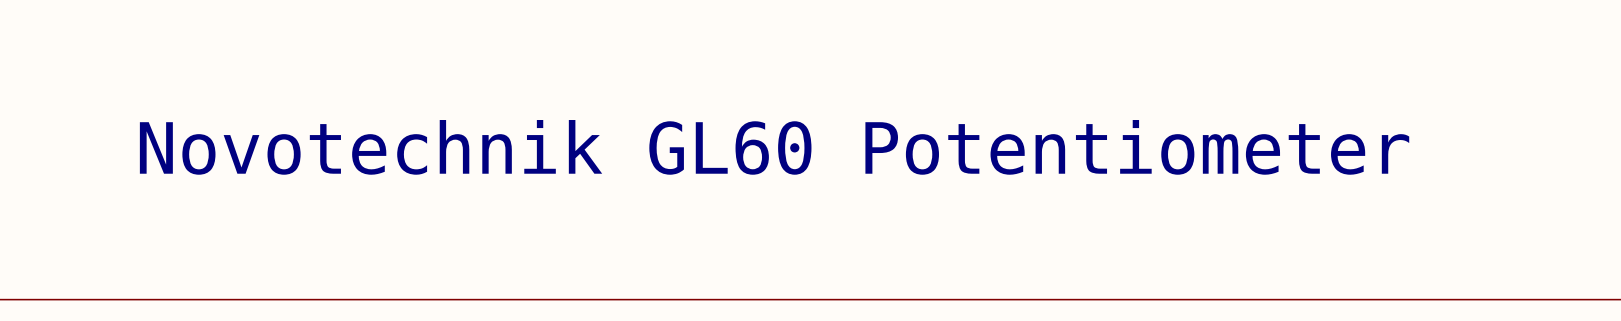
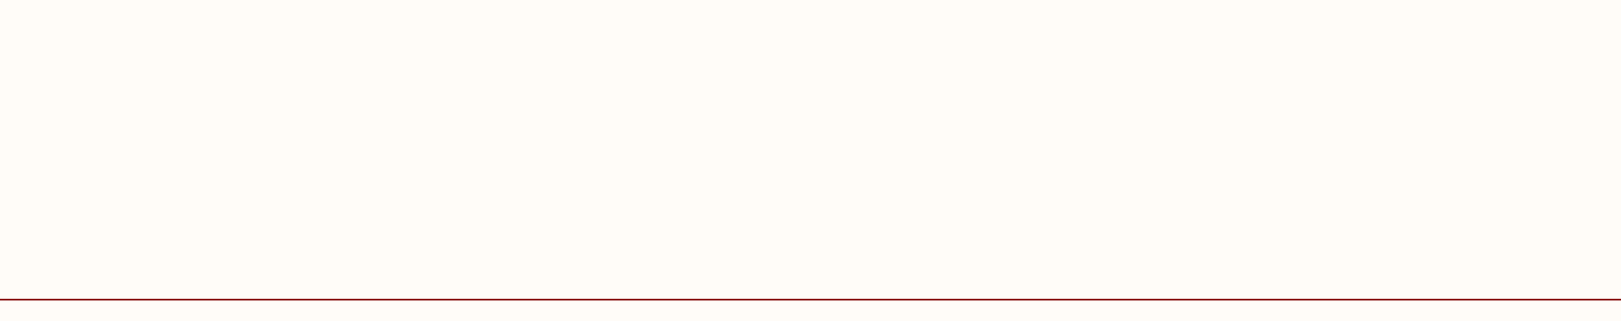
text: Novotechnik GL60 Potentiometer (774, 147) -> none

